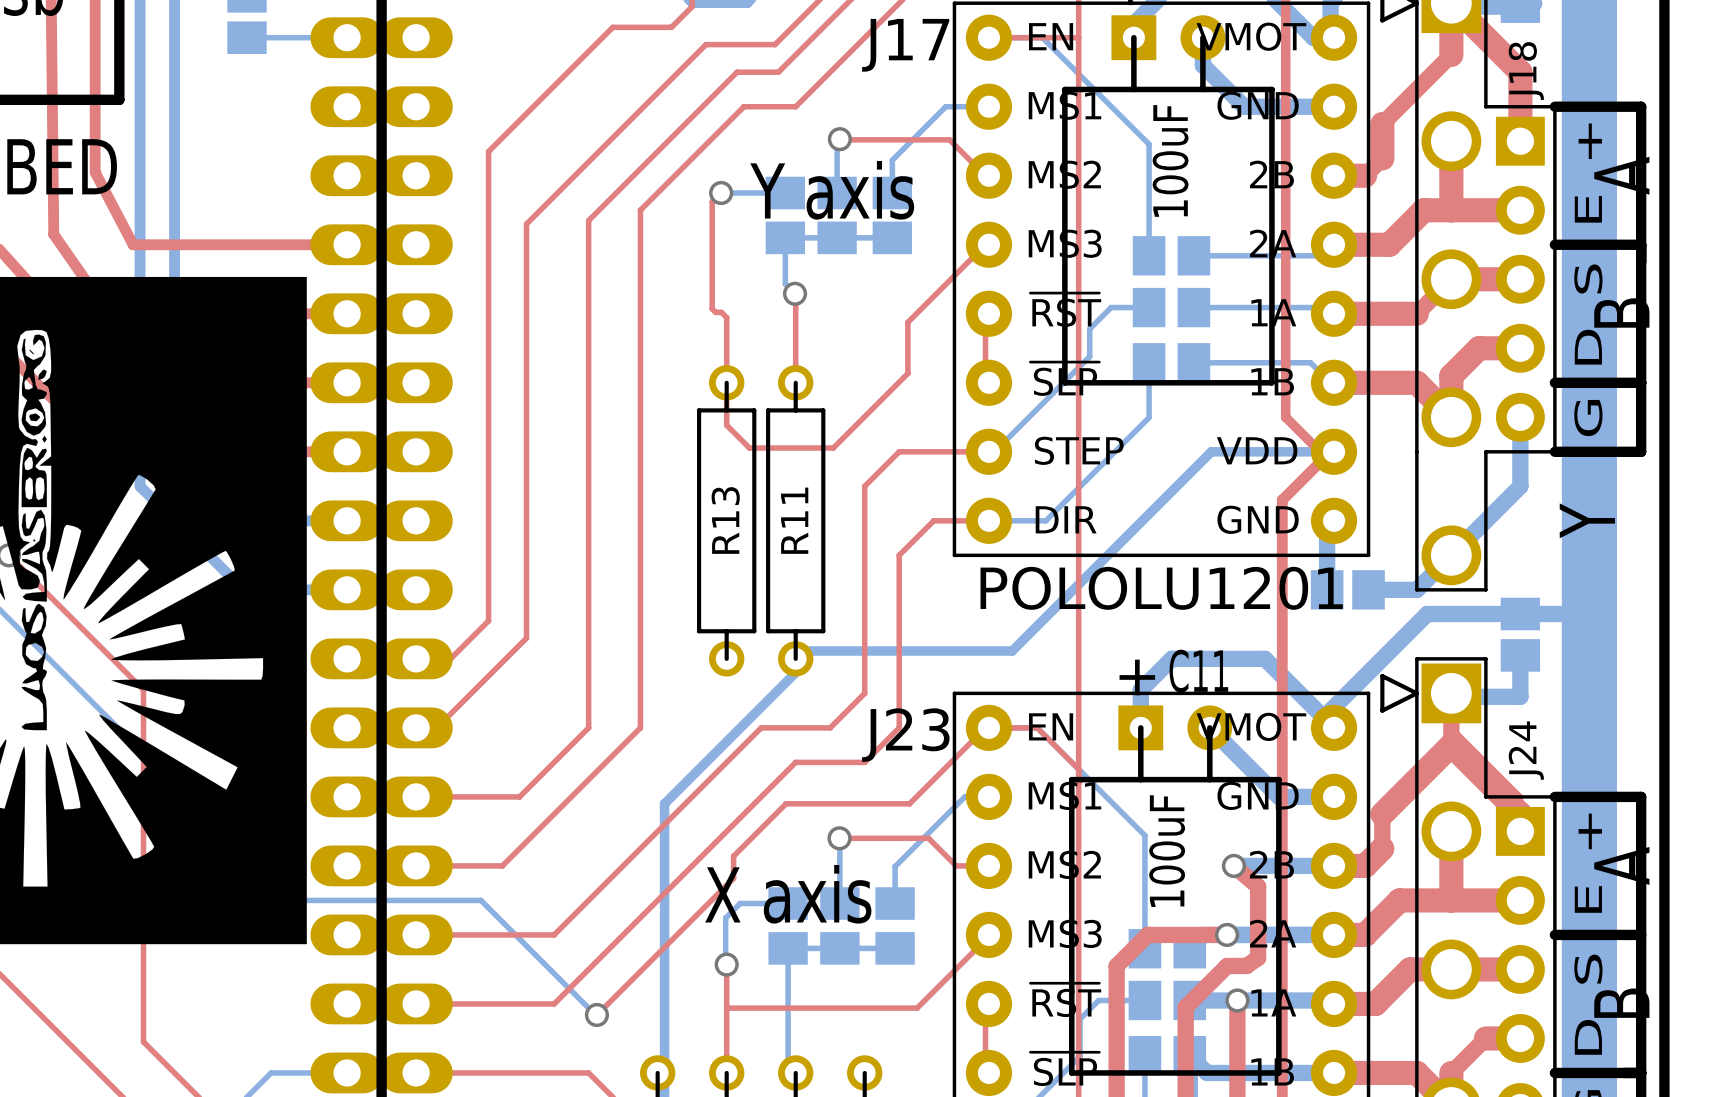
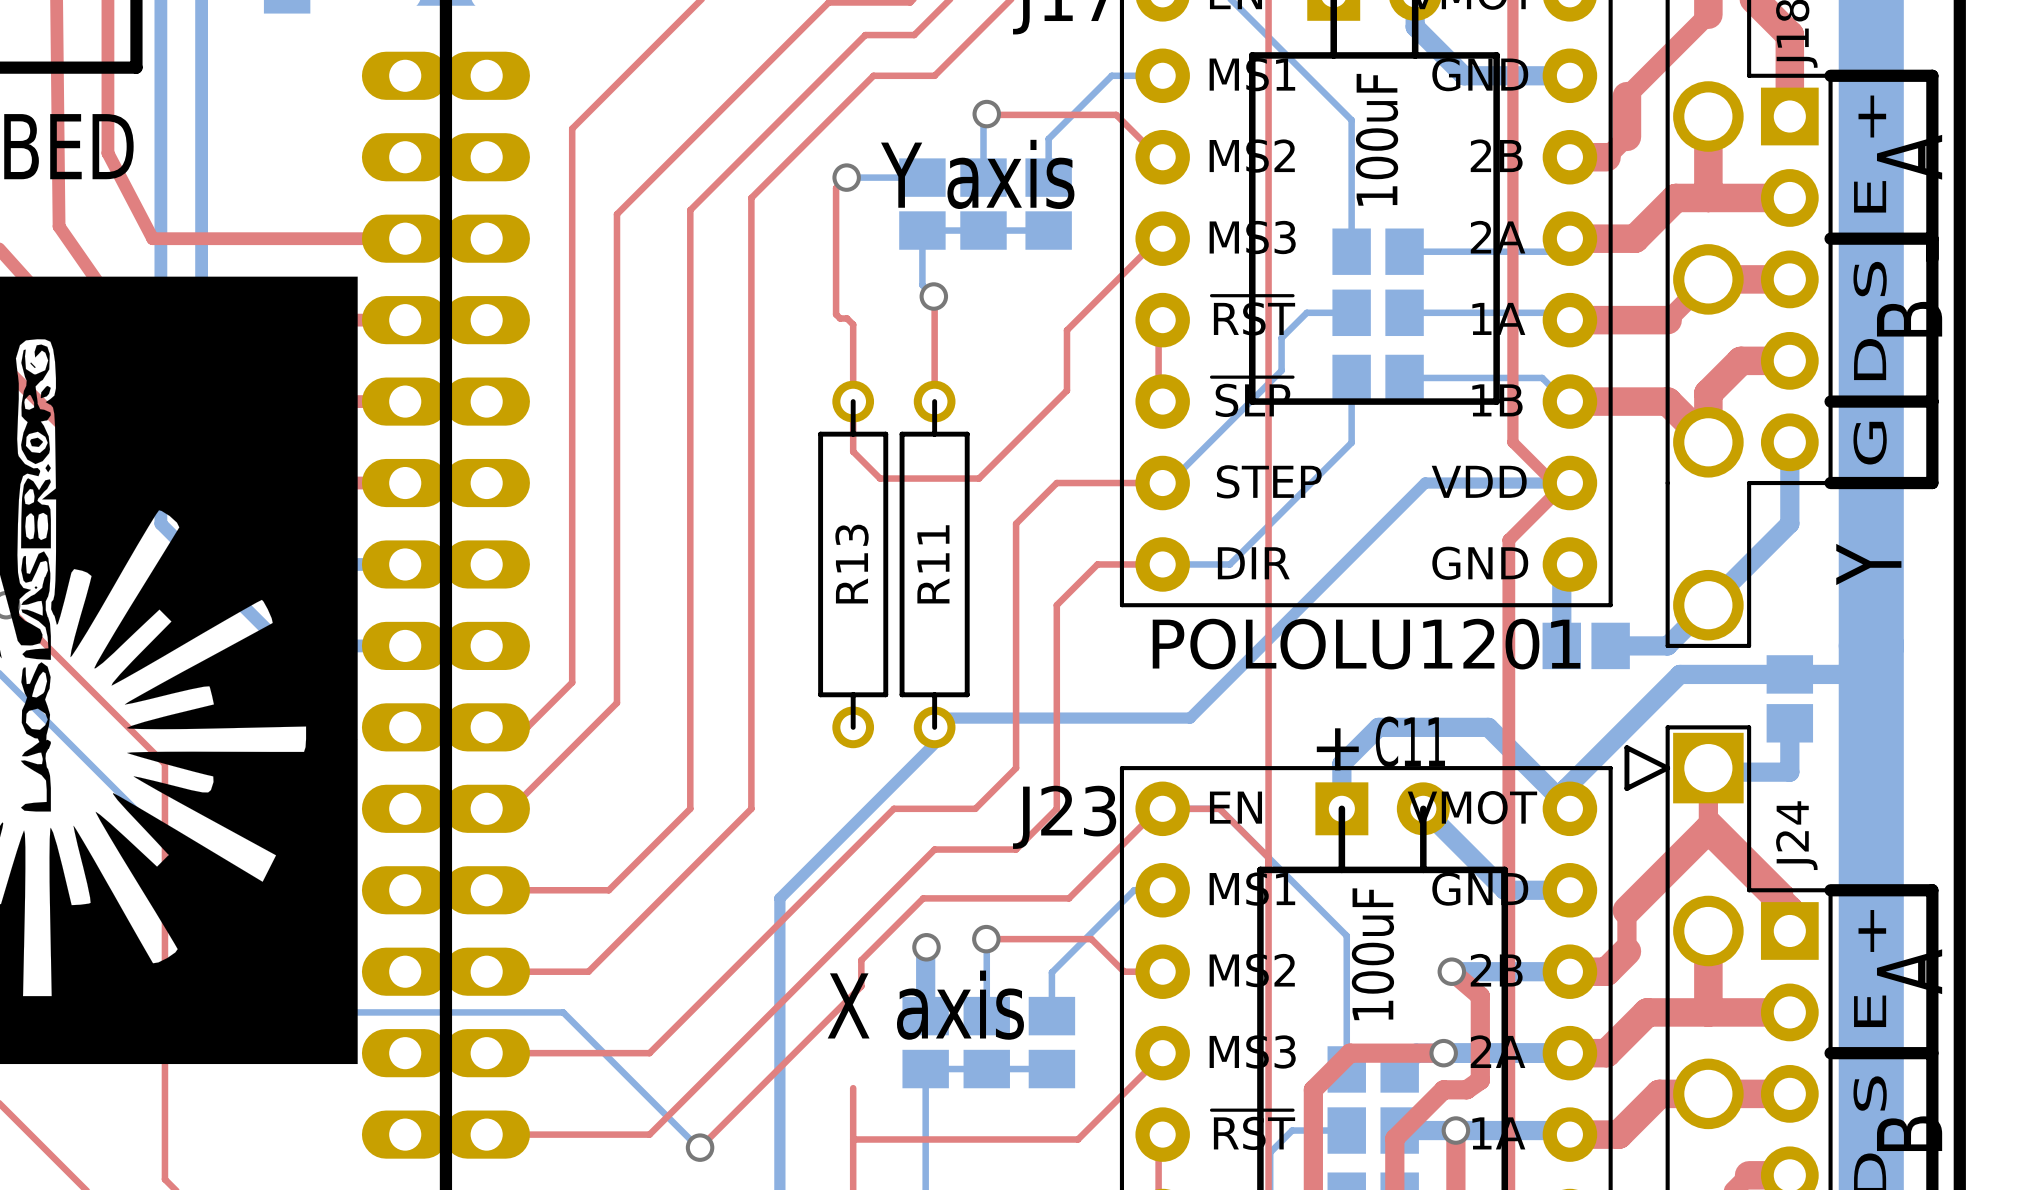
bottom track: (788, 903) (740, 903) (725, 918) (726, 964) -> (925, 1016) (926, 947)
via position: (726, 964) -> (926, 947)

